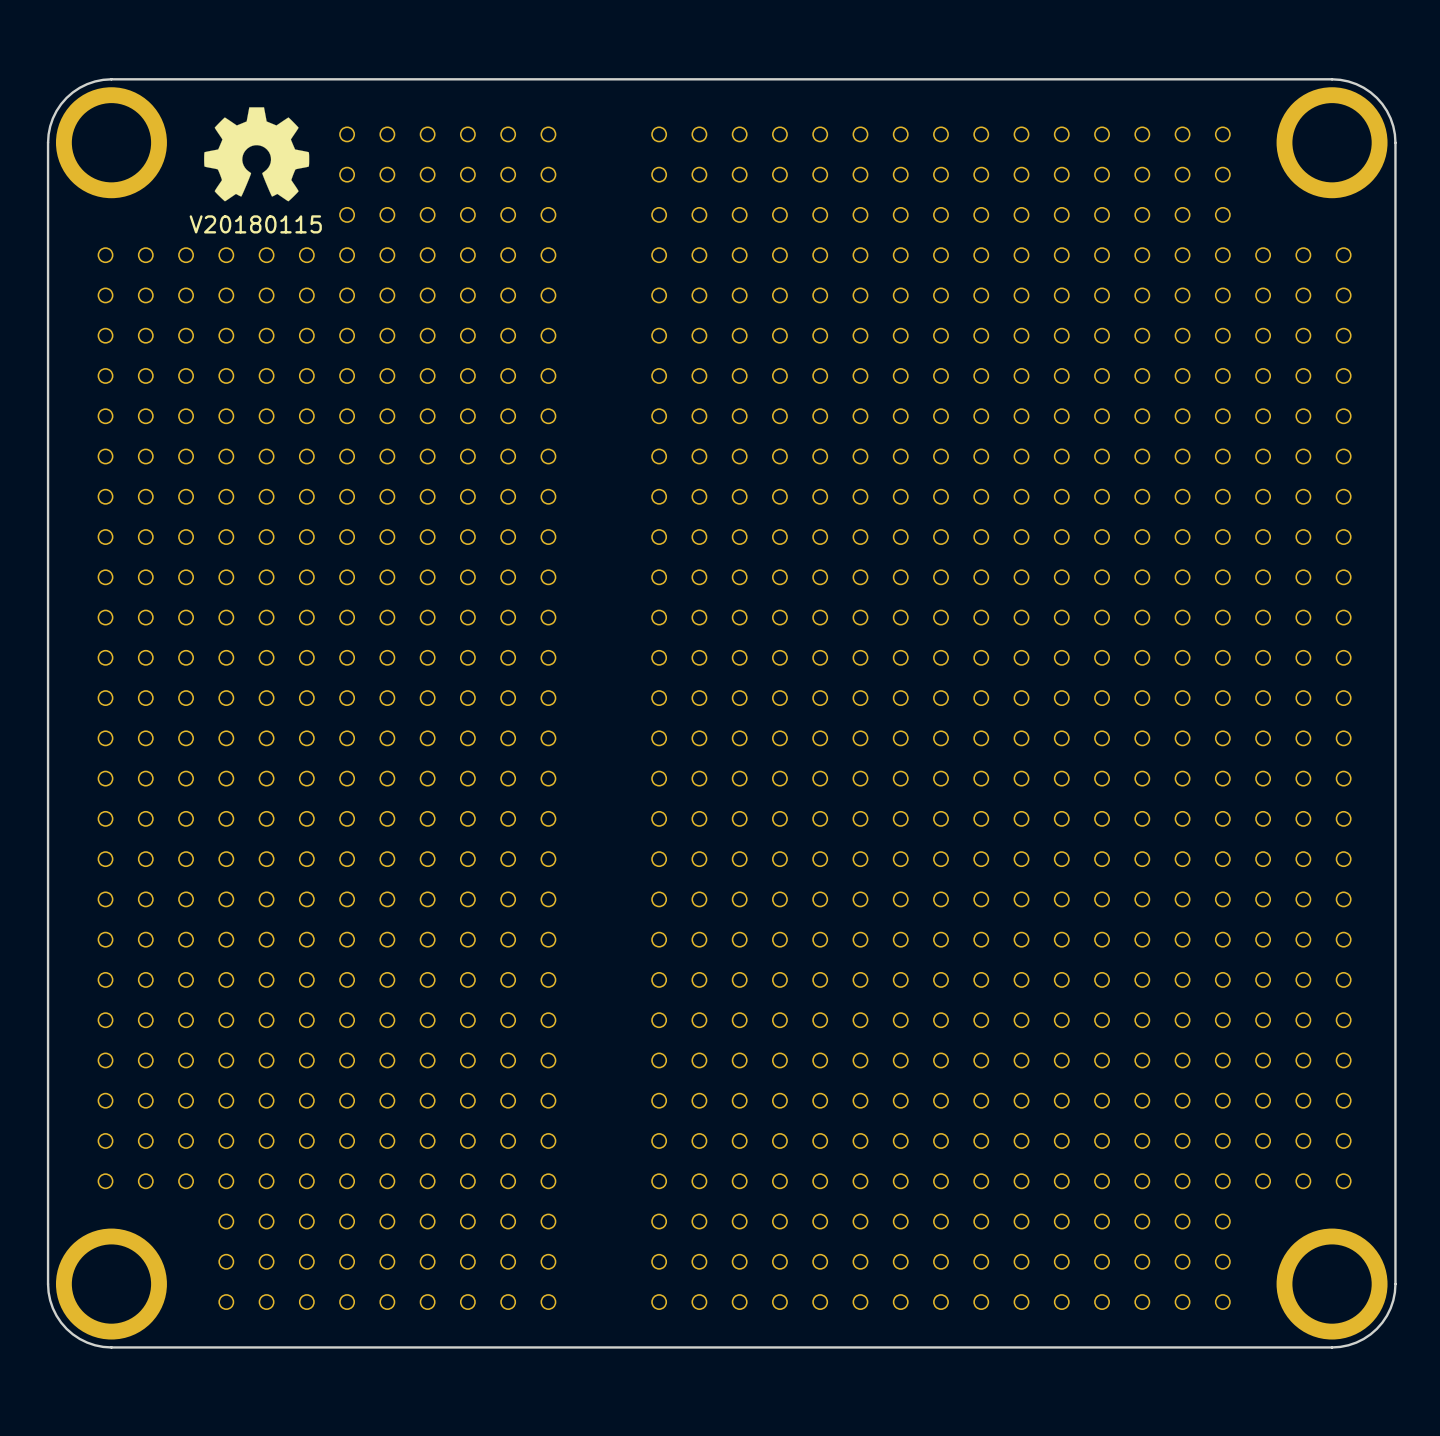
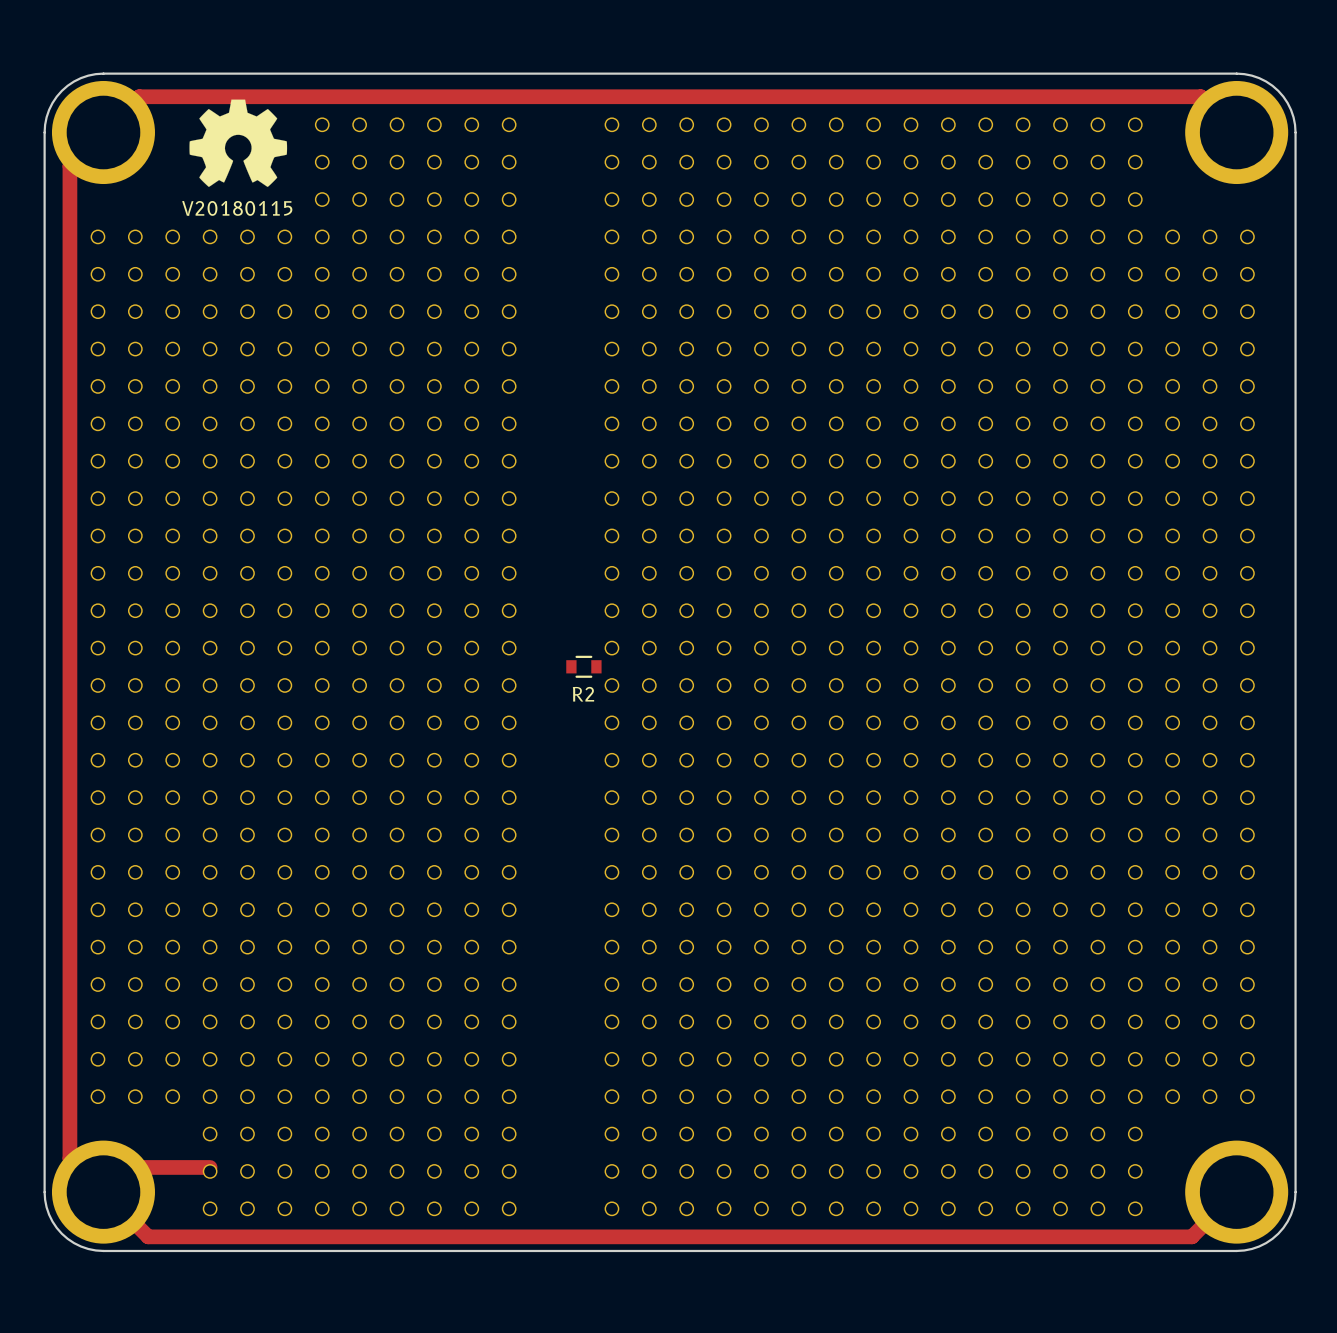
track: none -> (1236, 132) (1200, 96) (139, 96) (69, 166) (69, 1158) (148, 1236) (1191, 1236) (1236, 1192)
R2: none -> (583, 666)
track: none -> (210, 1167) (128, 1167) (103, 1192)

